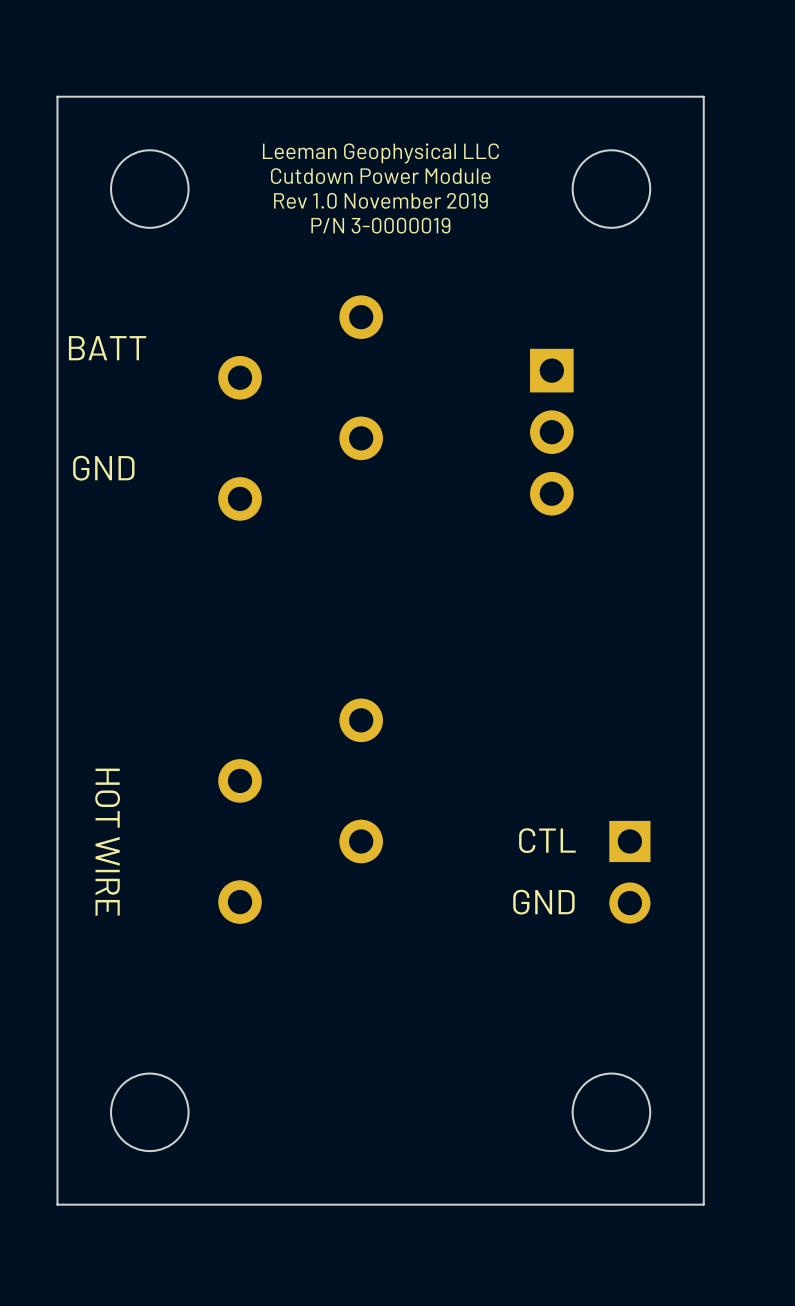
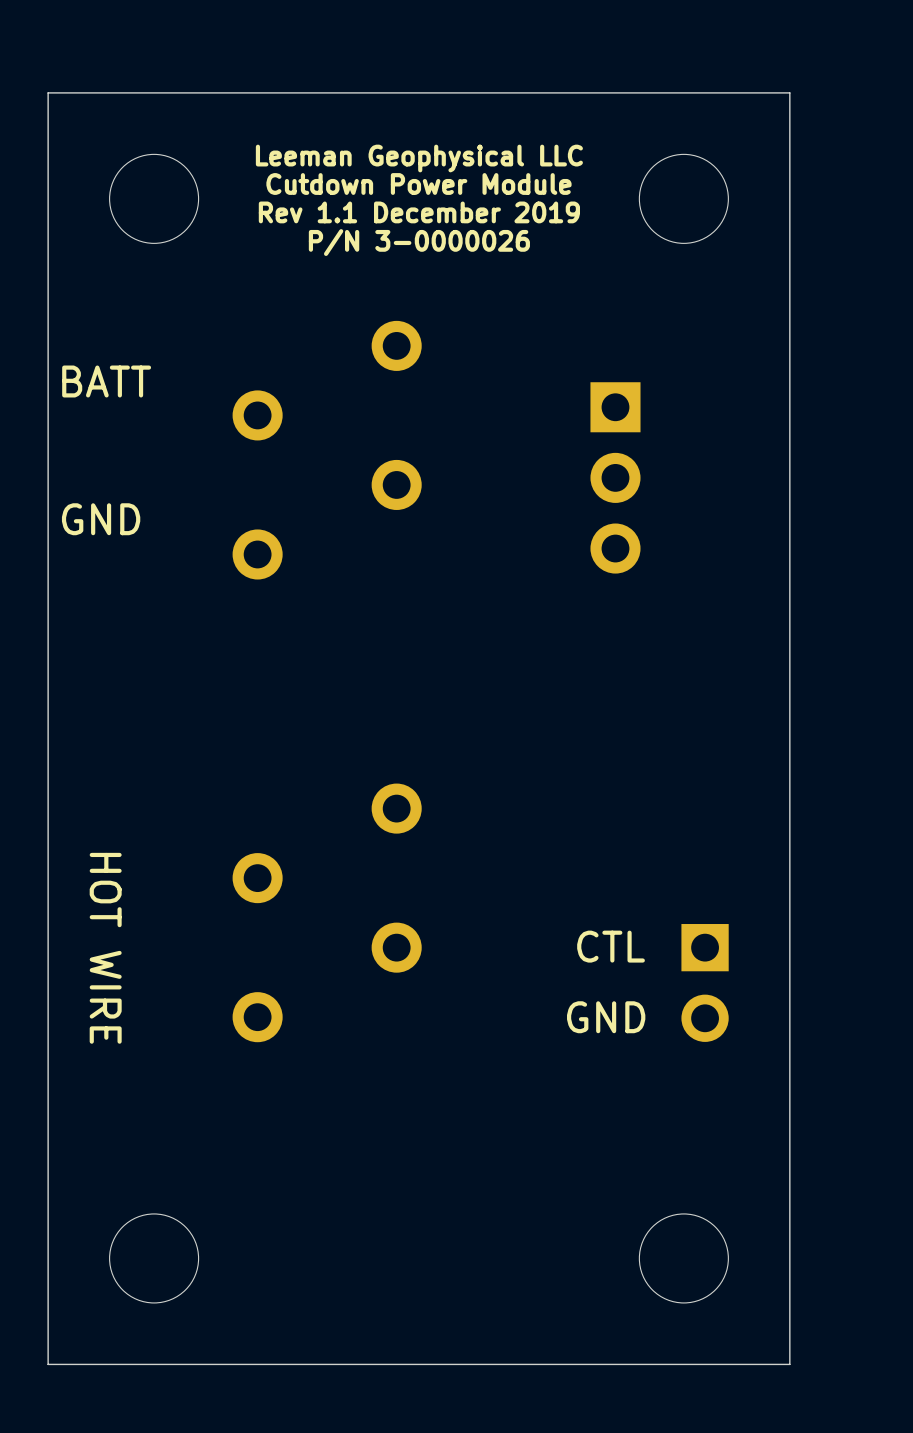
text: Rev 1.0 November 2019 (380, 200) -> Rev 1.1 December 2019 (419, 212)
text: P/N 3-0000019 (380, 225) -> P/N 3-0000026 (419, 242)

